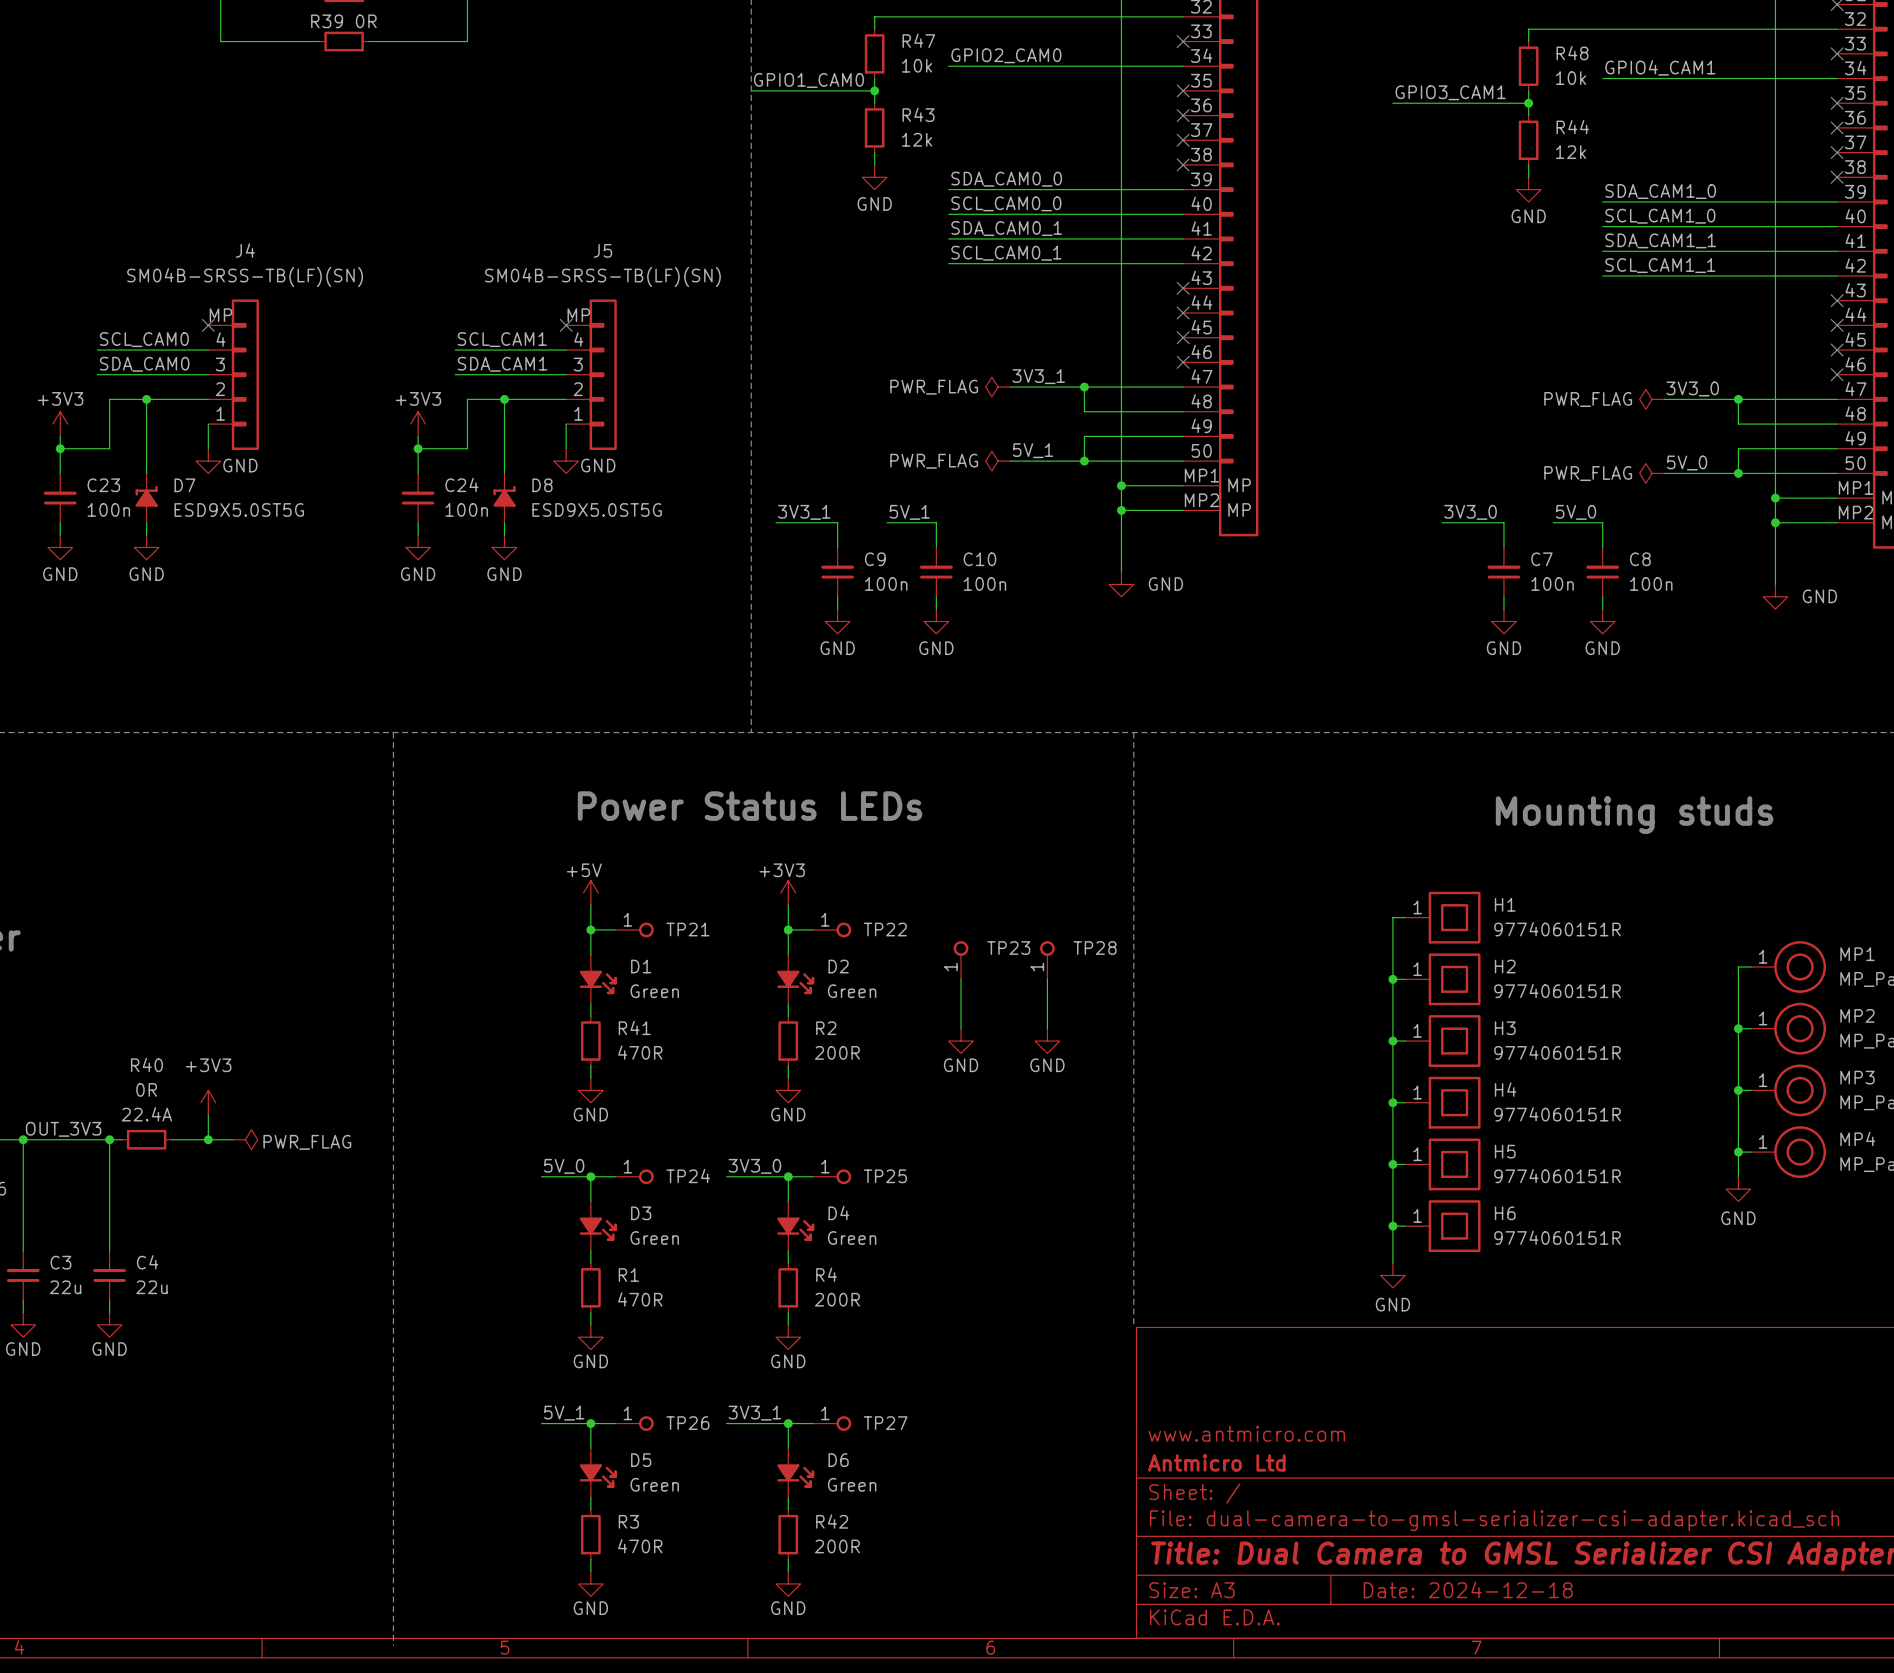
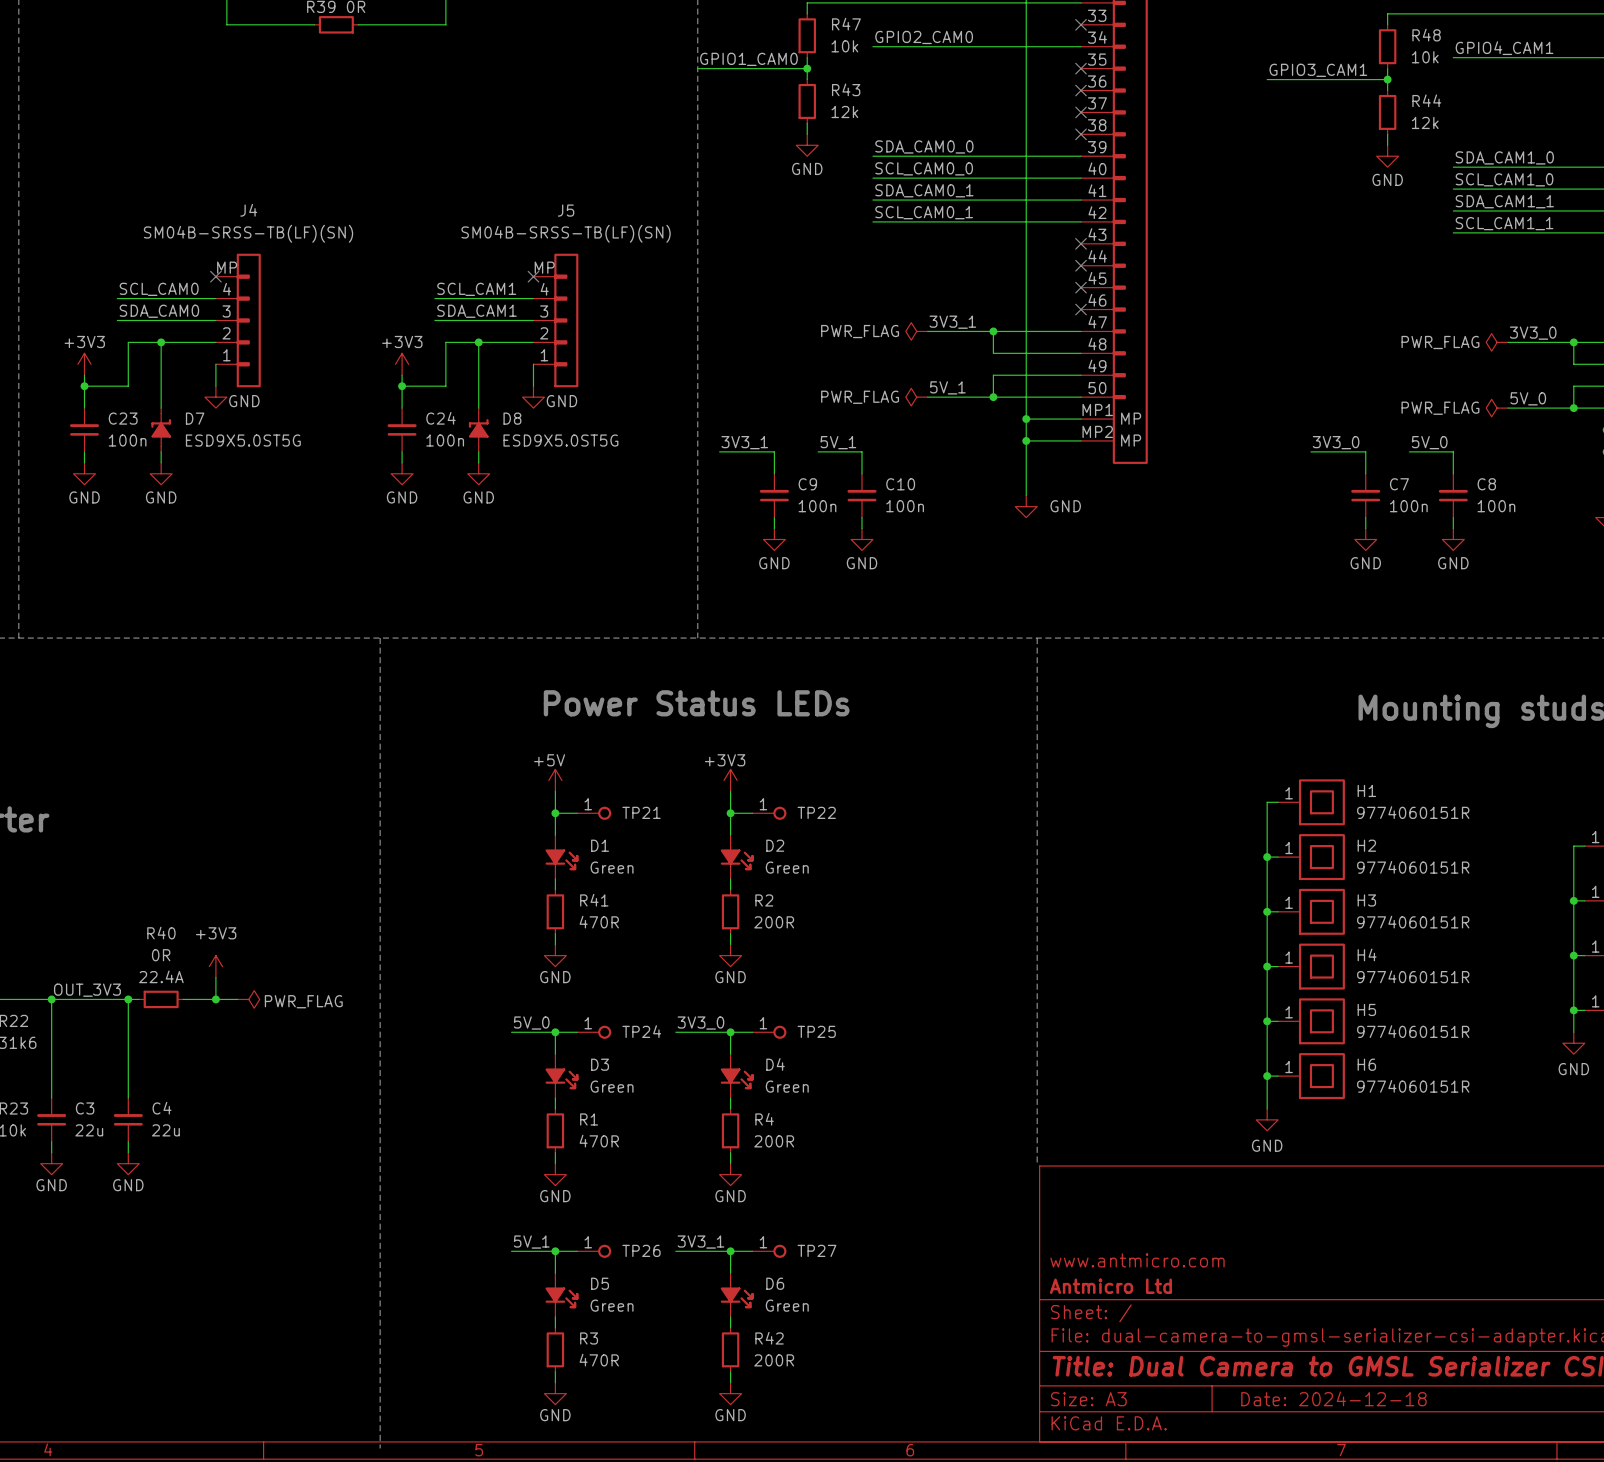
TP23: (961, 960) -> none
TP28: (1047, 960) -> none
wire: (961, 979) (961, 1028) -> none
wire: (1047, 979) (1047, 1028) -> none
power symbol: GND (961, 1041) -> none
power symbol: GND (1047, 1041) -> none

